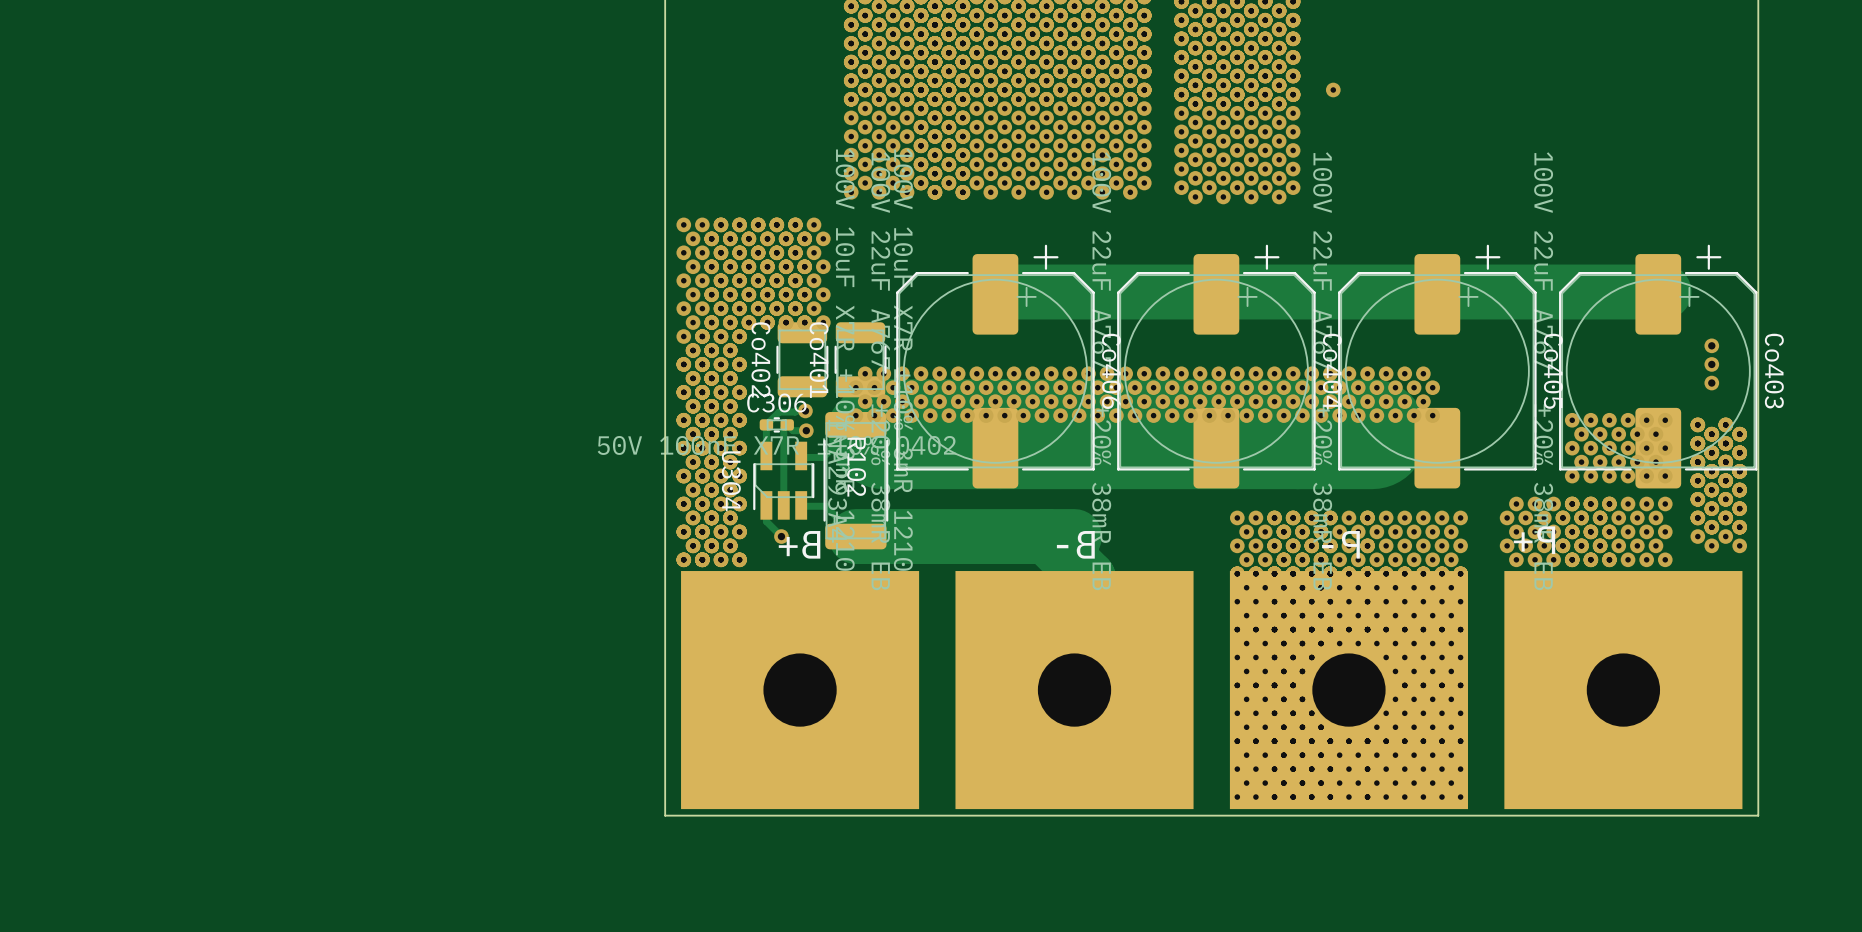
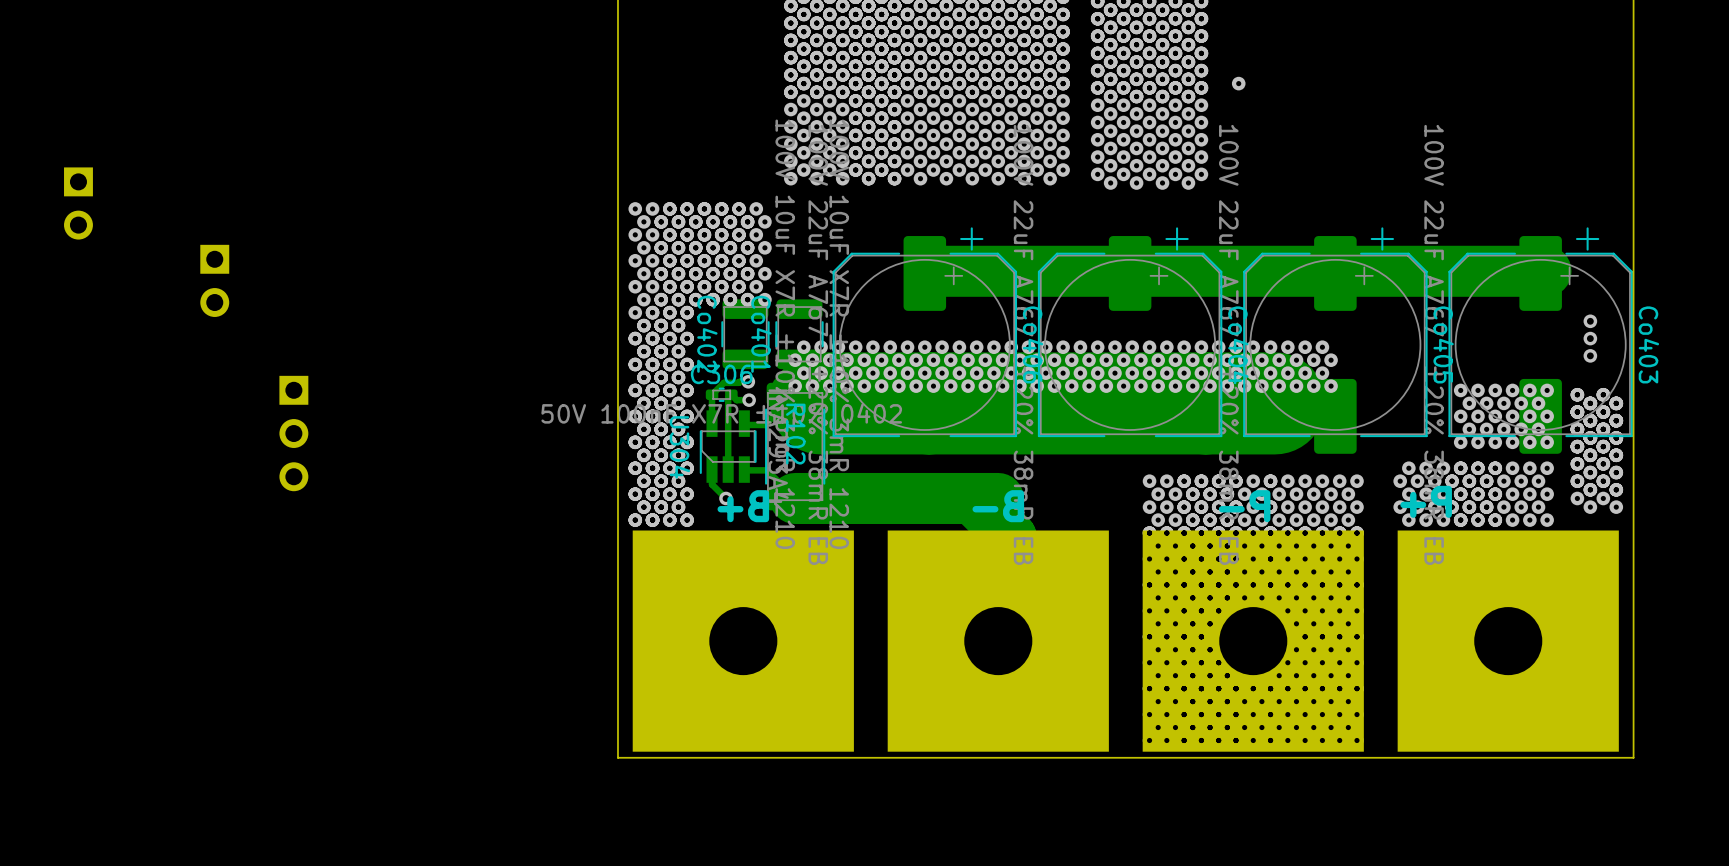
part: none -> (78, 203)
part: none -> (214, 280)
part: none -> (293, 433)

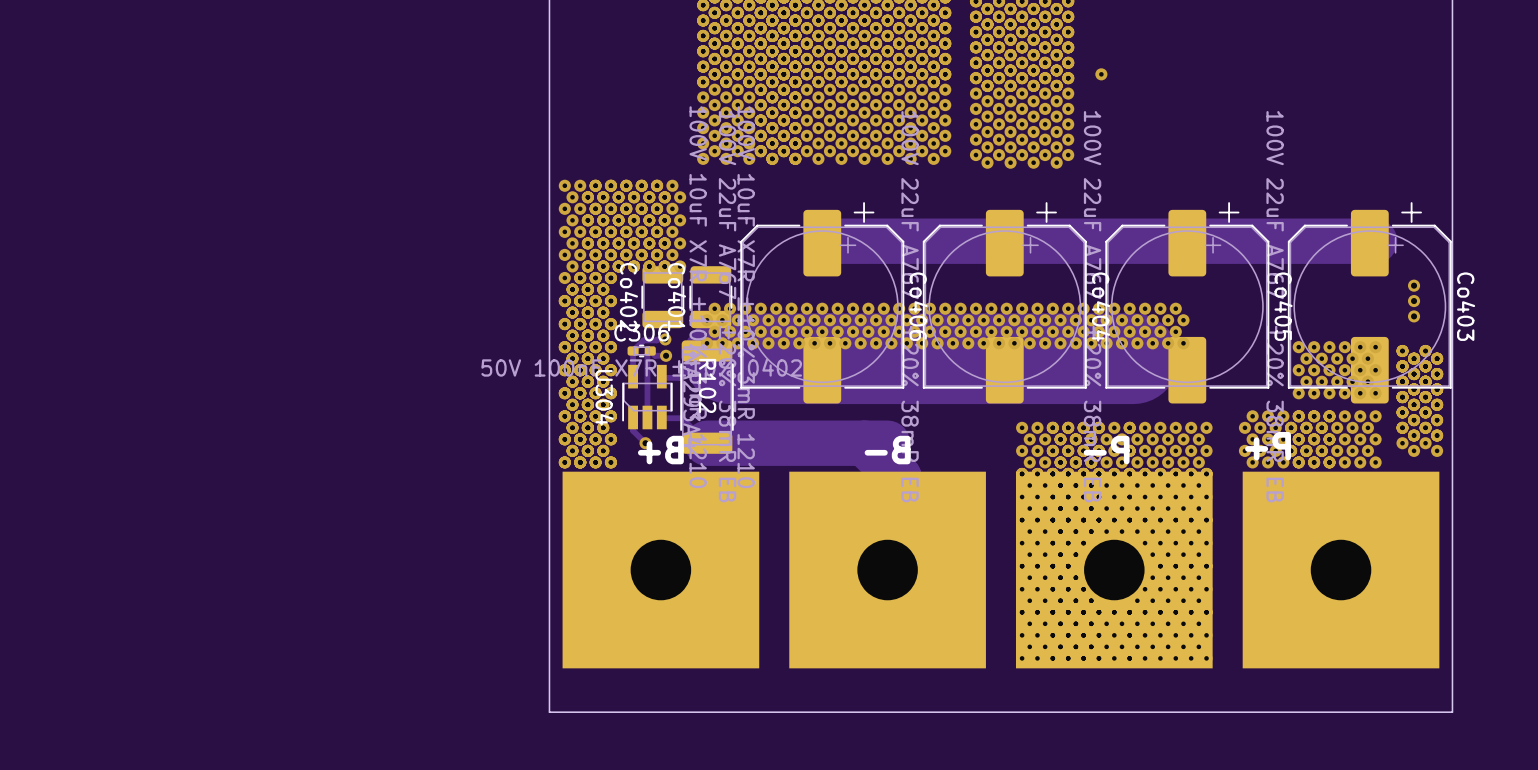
part: (78, 203) -> none
part: (214, 280) -> none
part: (293, 433) -> none
board edge: (1633, 757) (617, 757) -> (1452, 673) (1452, 712) (549, 712) (549, 673)

